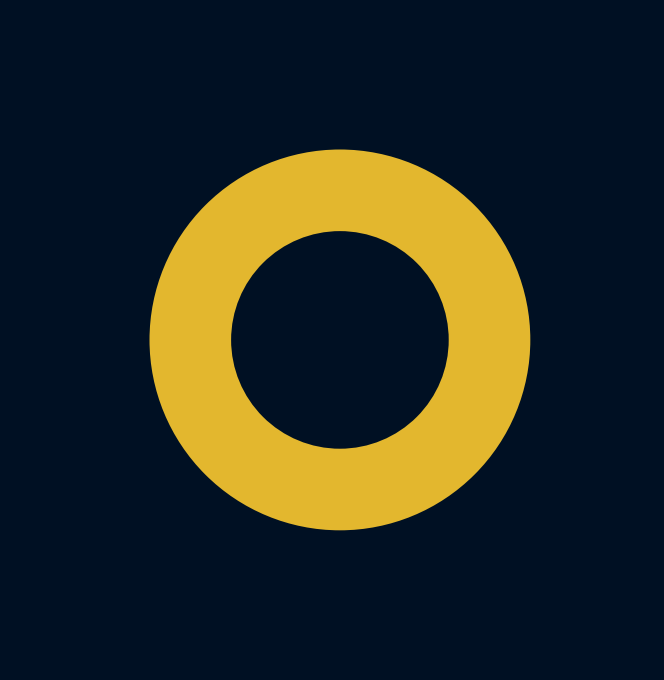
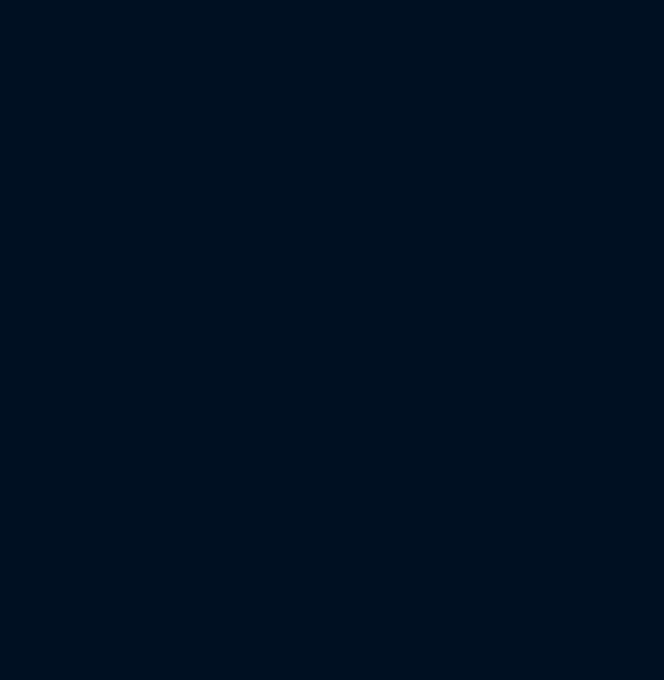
part: (339, 339) -> none

